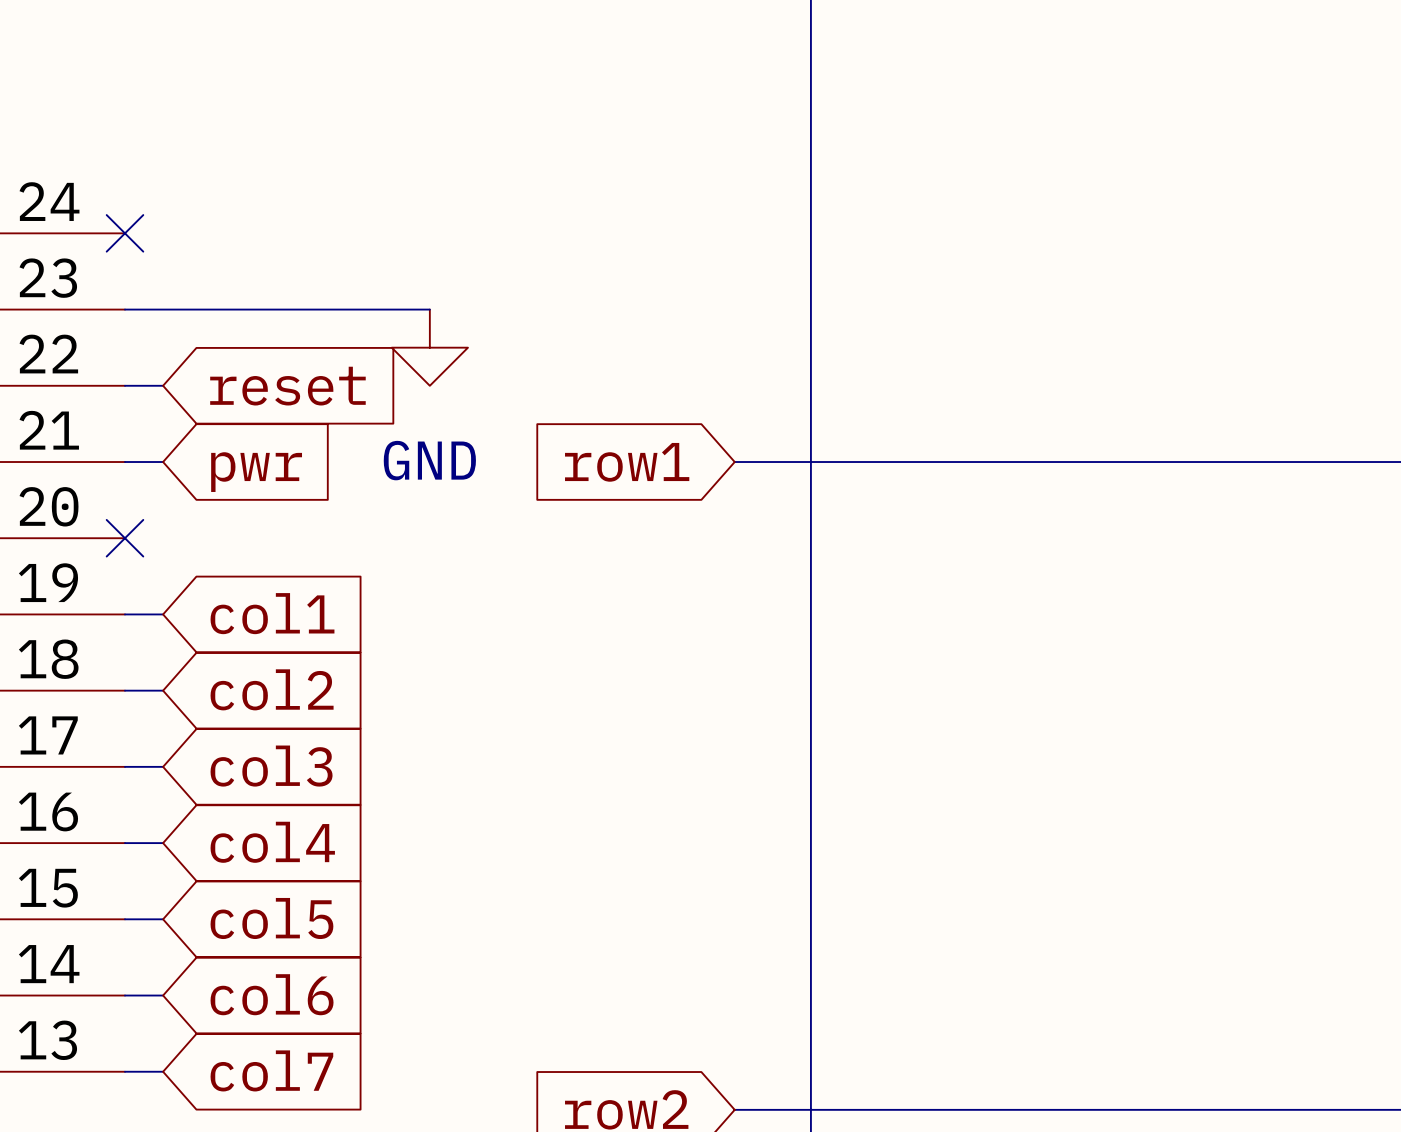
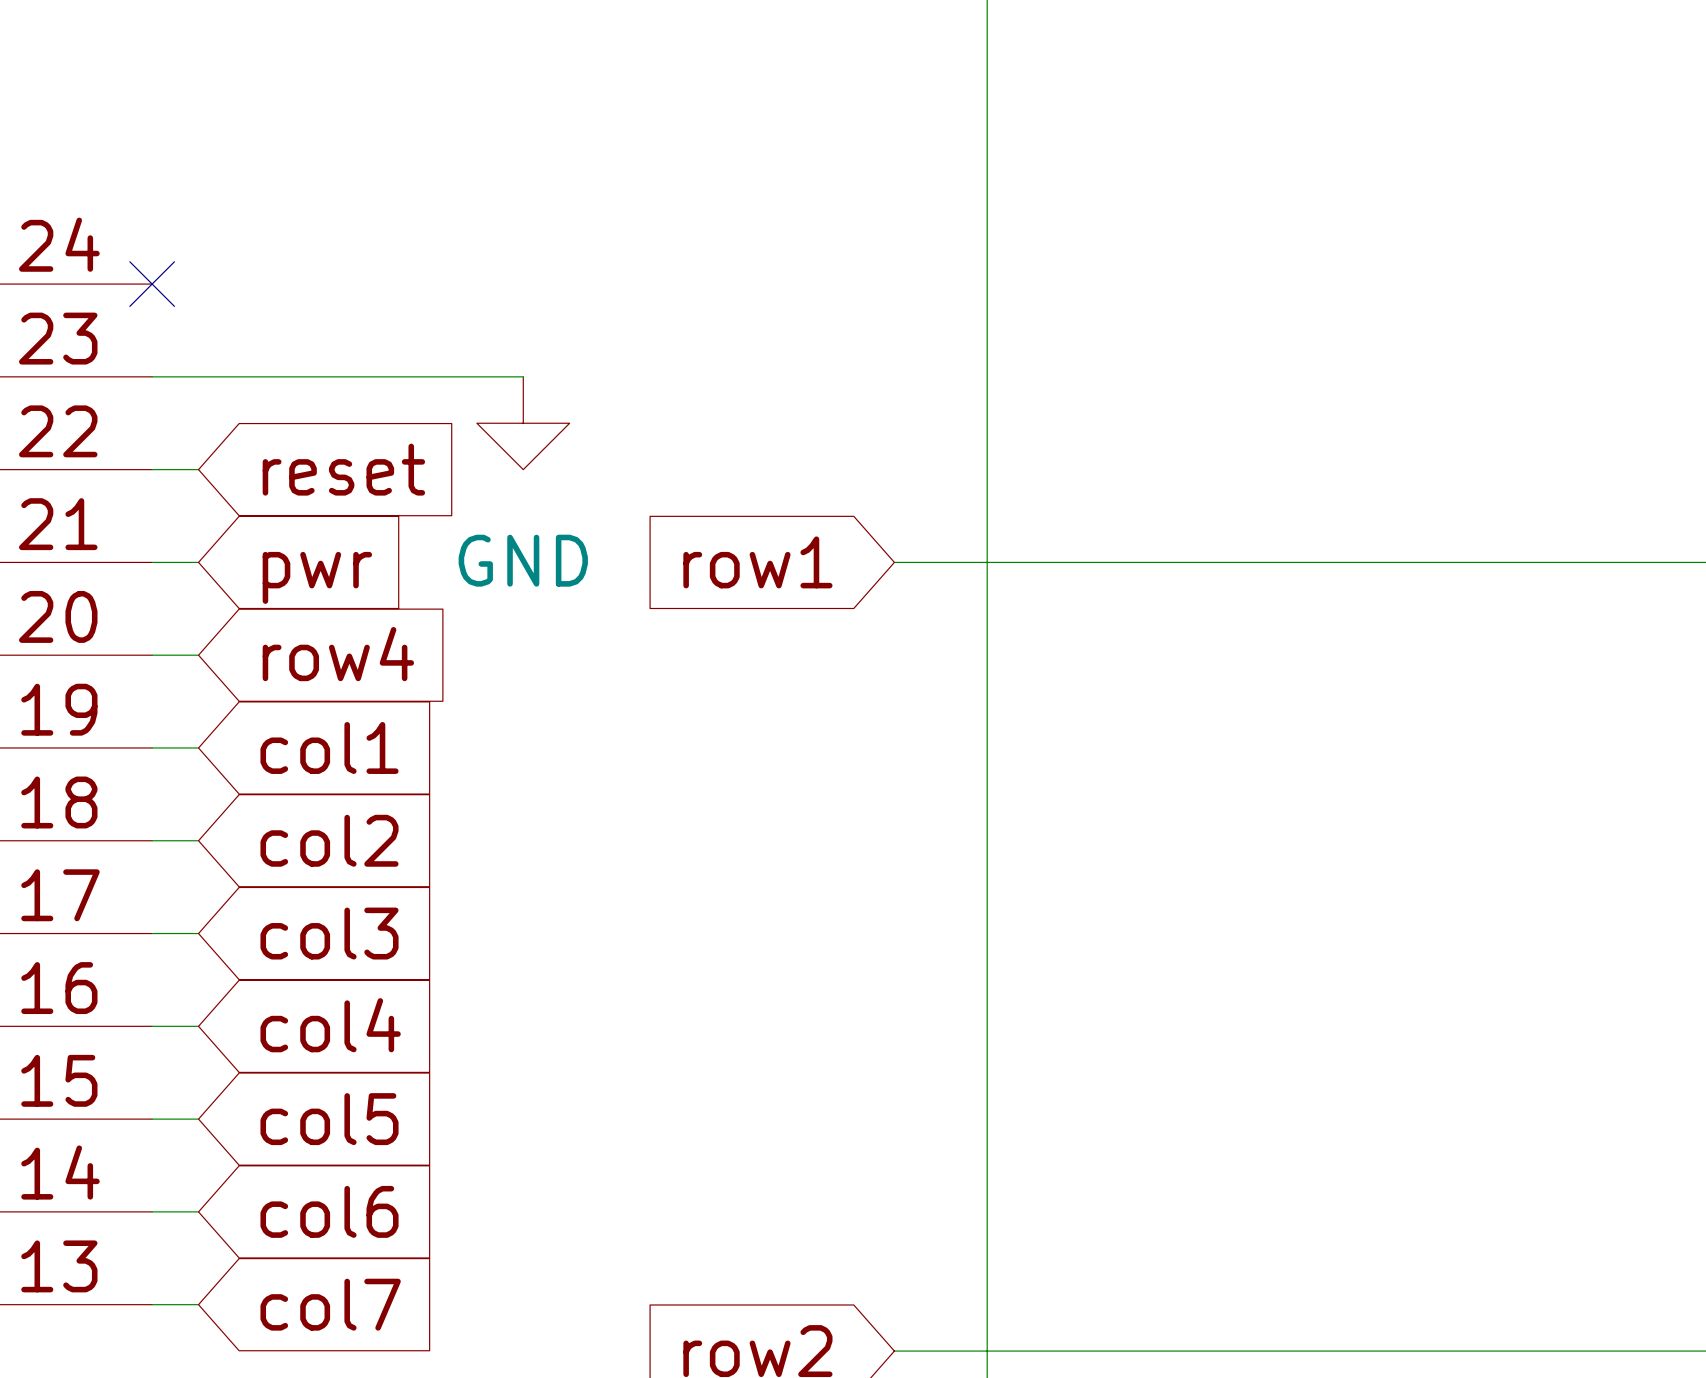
wire: none -> (152, 655) (198, 655)
no-connect mark: (124, 538) -> none
global label: none -> row4 (338, 654)

